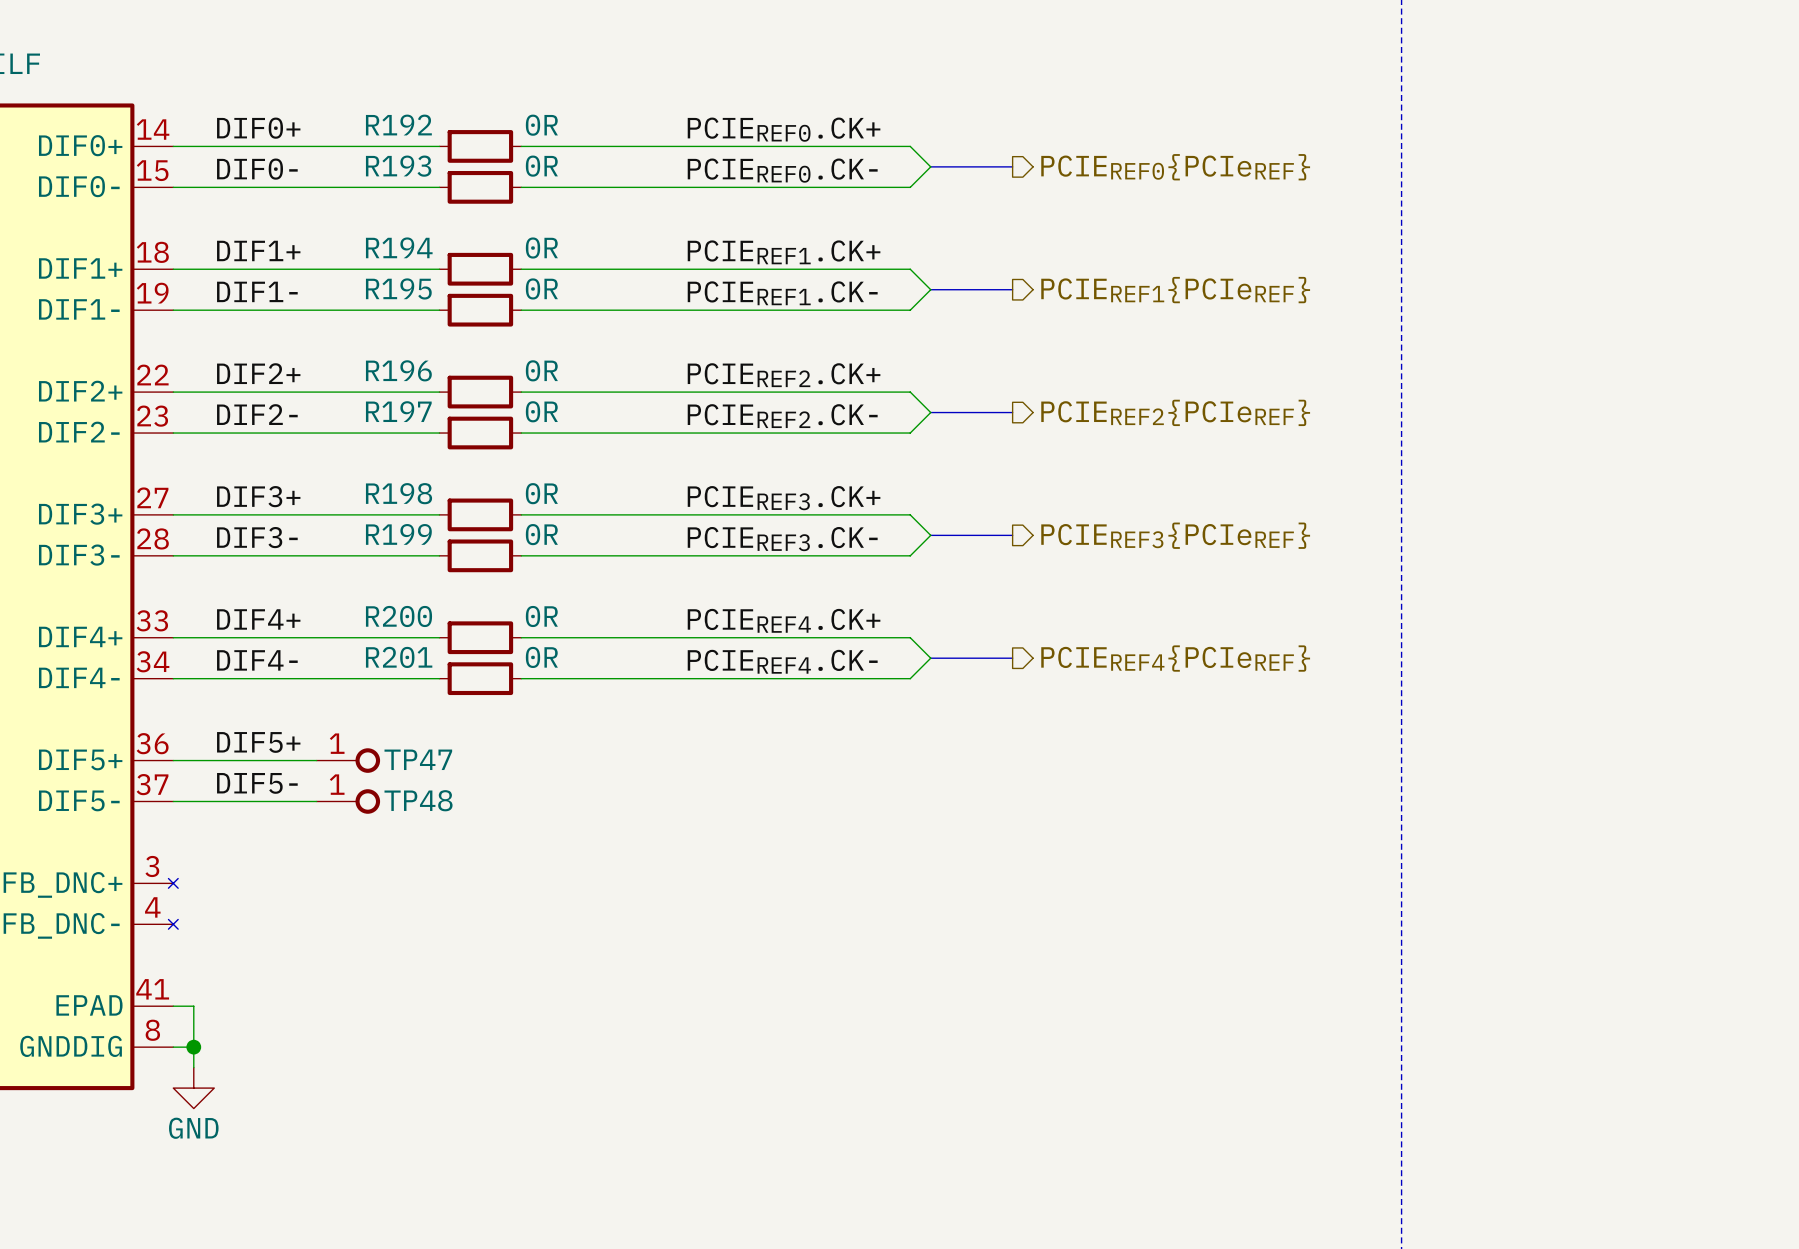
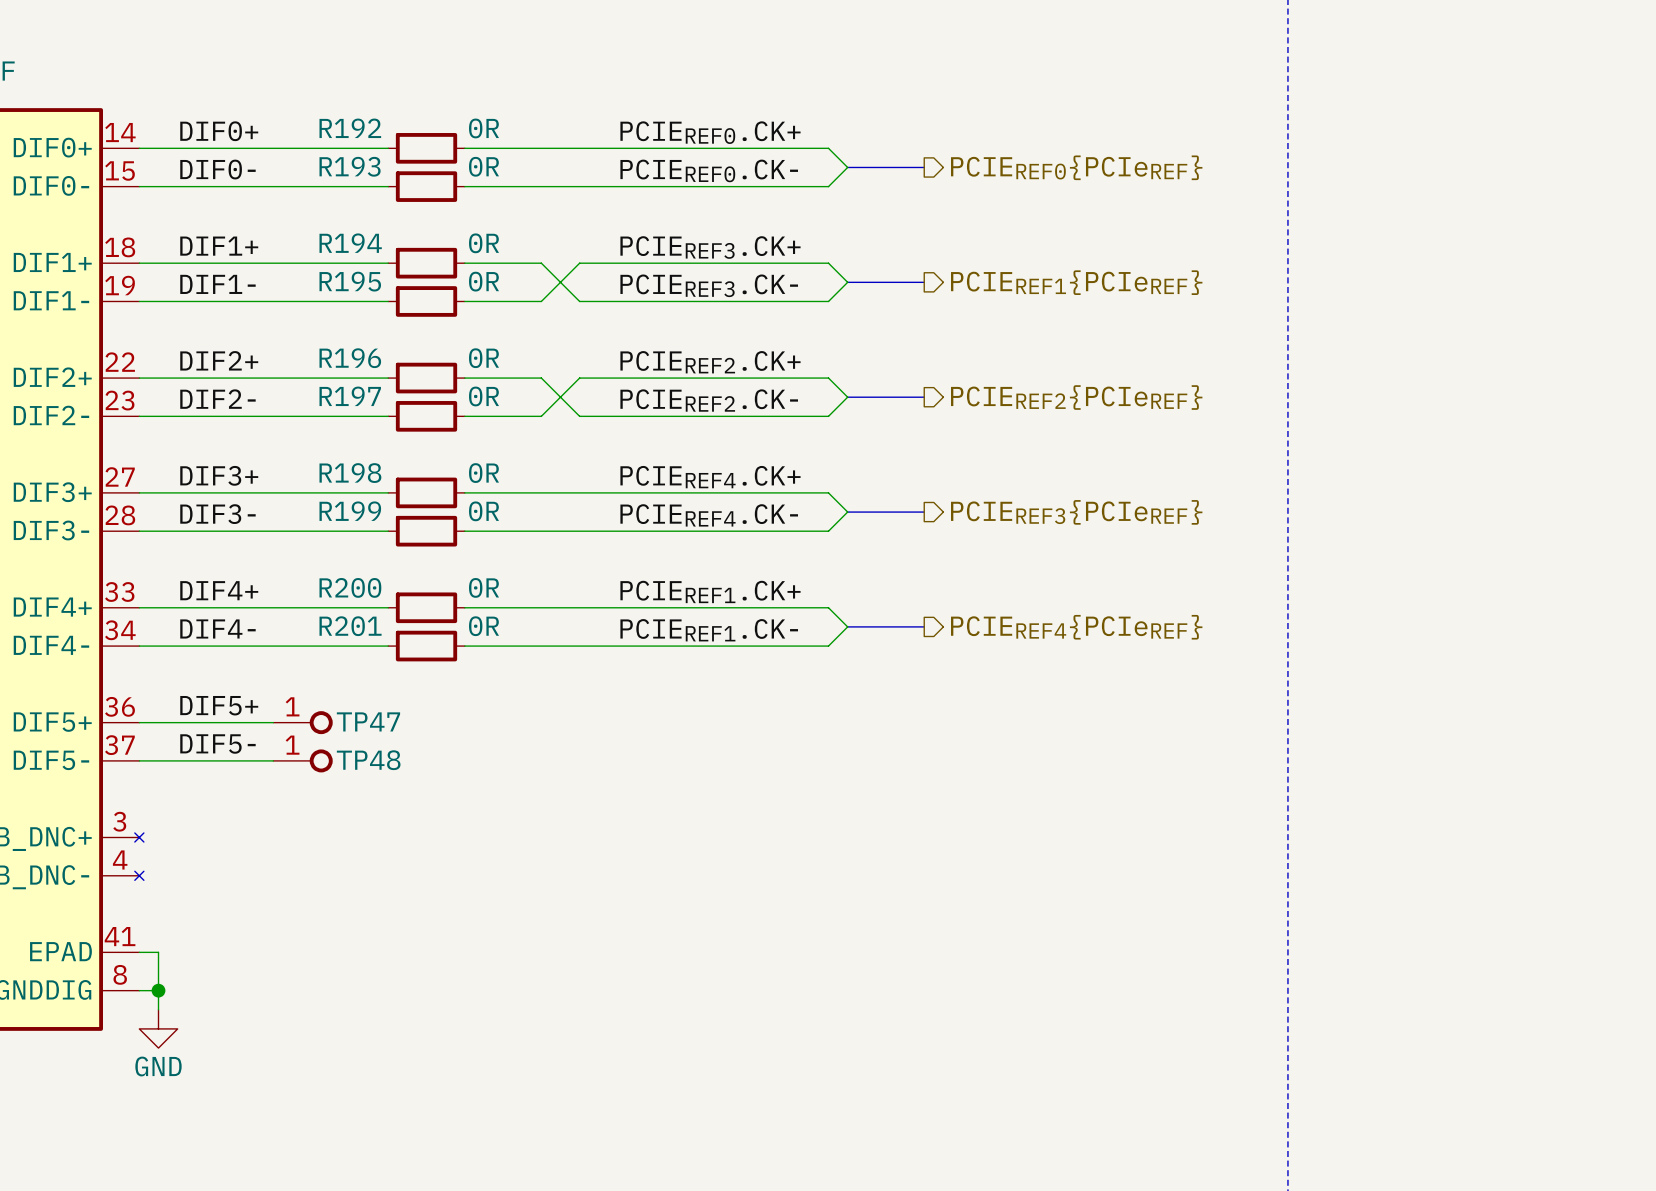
label: PCIEREF1.CK+ (784, 252) -> PCIEREF3.CK+ (710, 247)
wire: (603, 269) (644, 269) -> (541, 263) (579, 301)
label: PCIEREF1.CK- (782, 293) -> PCIEREF3.CK- (709, 285)
wire: (603, 310) (644, 310) -> (541, 301) (579, 263)
wire: (603, 392) (644, 392) -> (541, 378) (579, 416)
wire: (603, 433) (644, 433) -> (541, 416) (579, 378)
label: PCIEREF3.CK+ (784, 498) -> PCIEREF4.CK+ (710, 477)
label: PCIEREF3.CK- (782, 539) -> PCIEREF4.CK- (709, 515)
label: PCIEREF4.CK+ (784, 620) -> PCIEREF1.CK+ (710, 591)
label: PCIEREF4.CK- (782, 661) -> PCIEREF1.CK- (709, 630)

